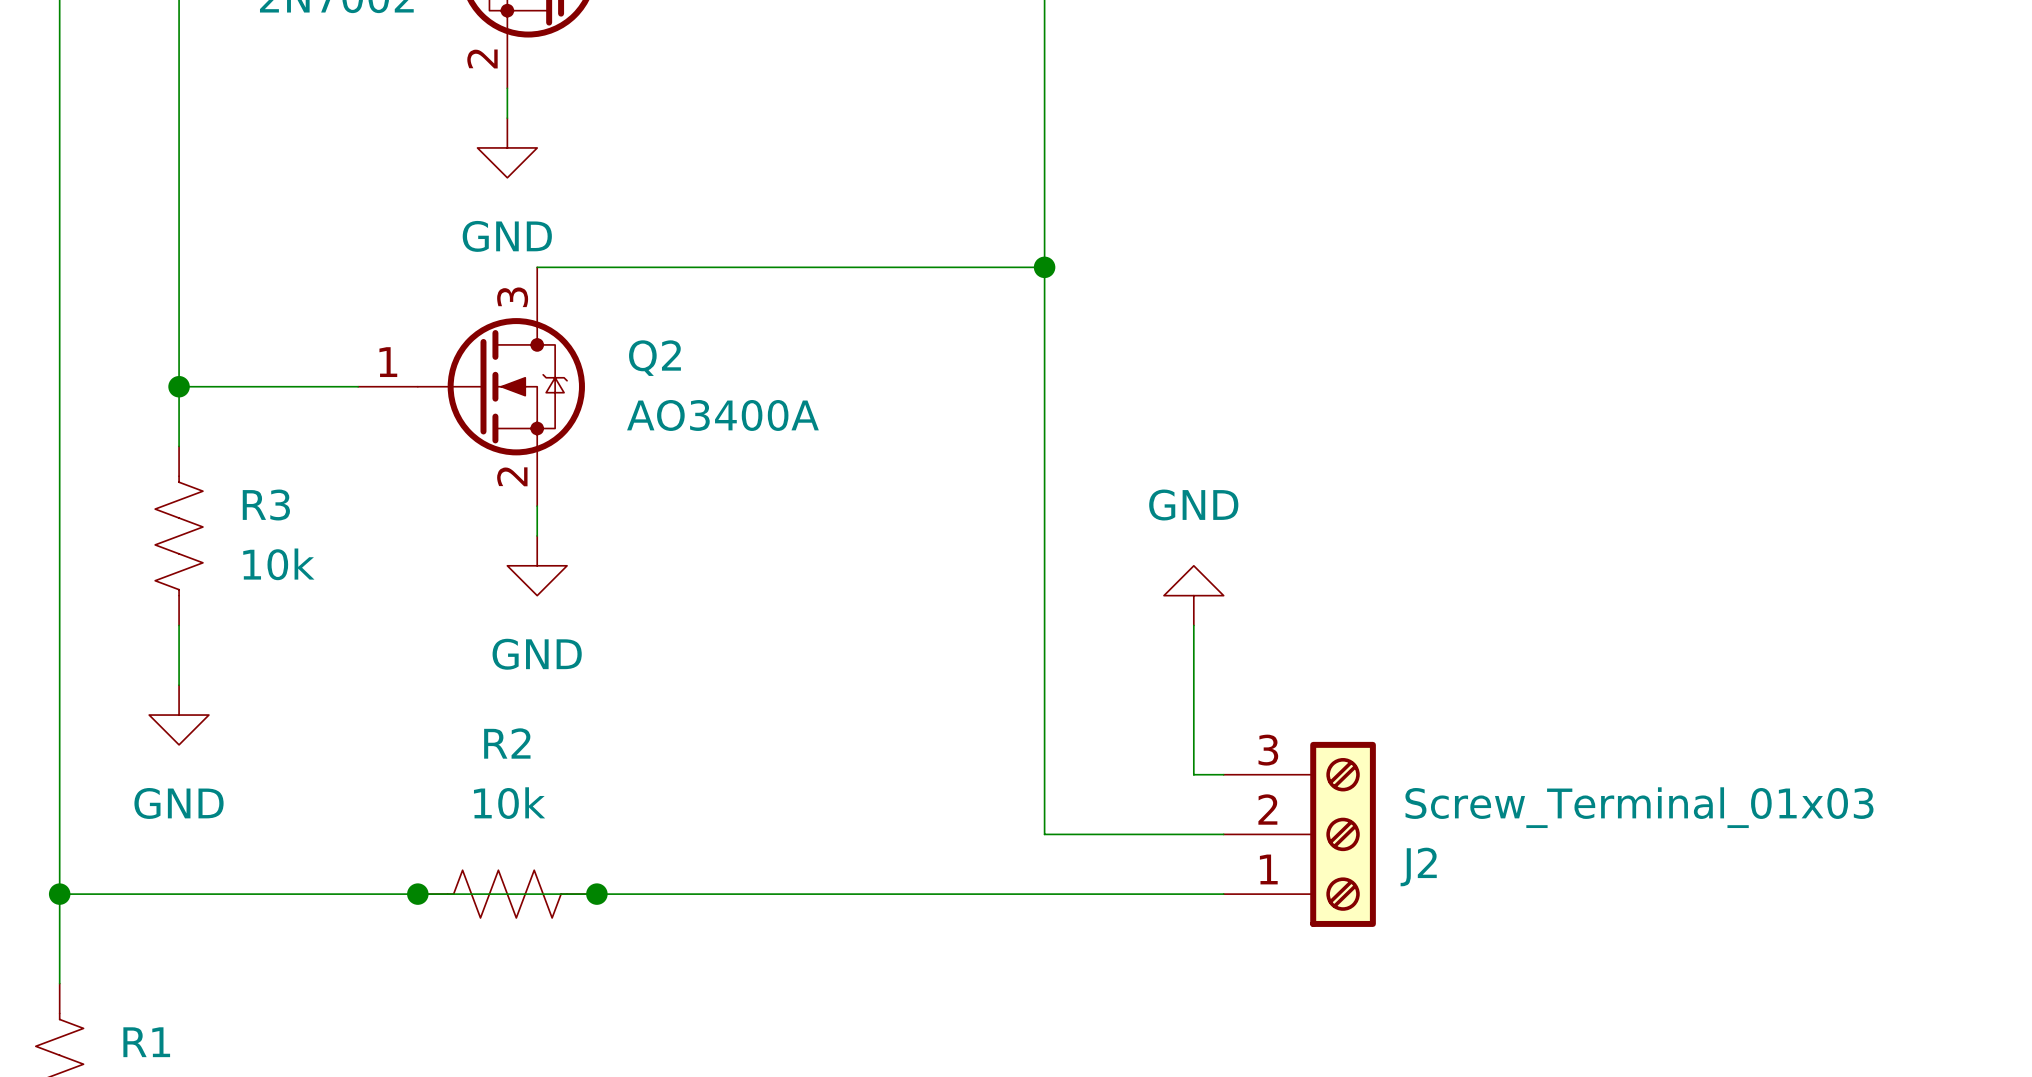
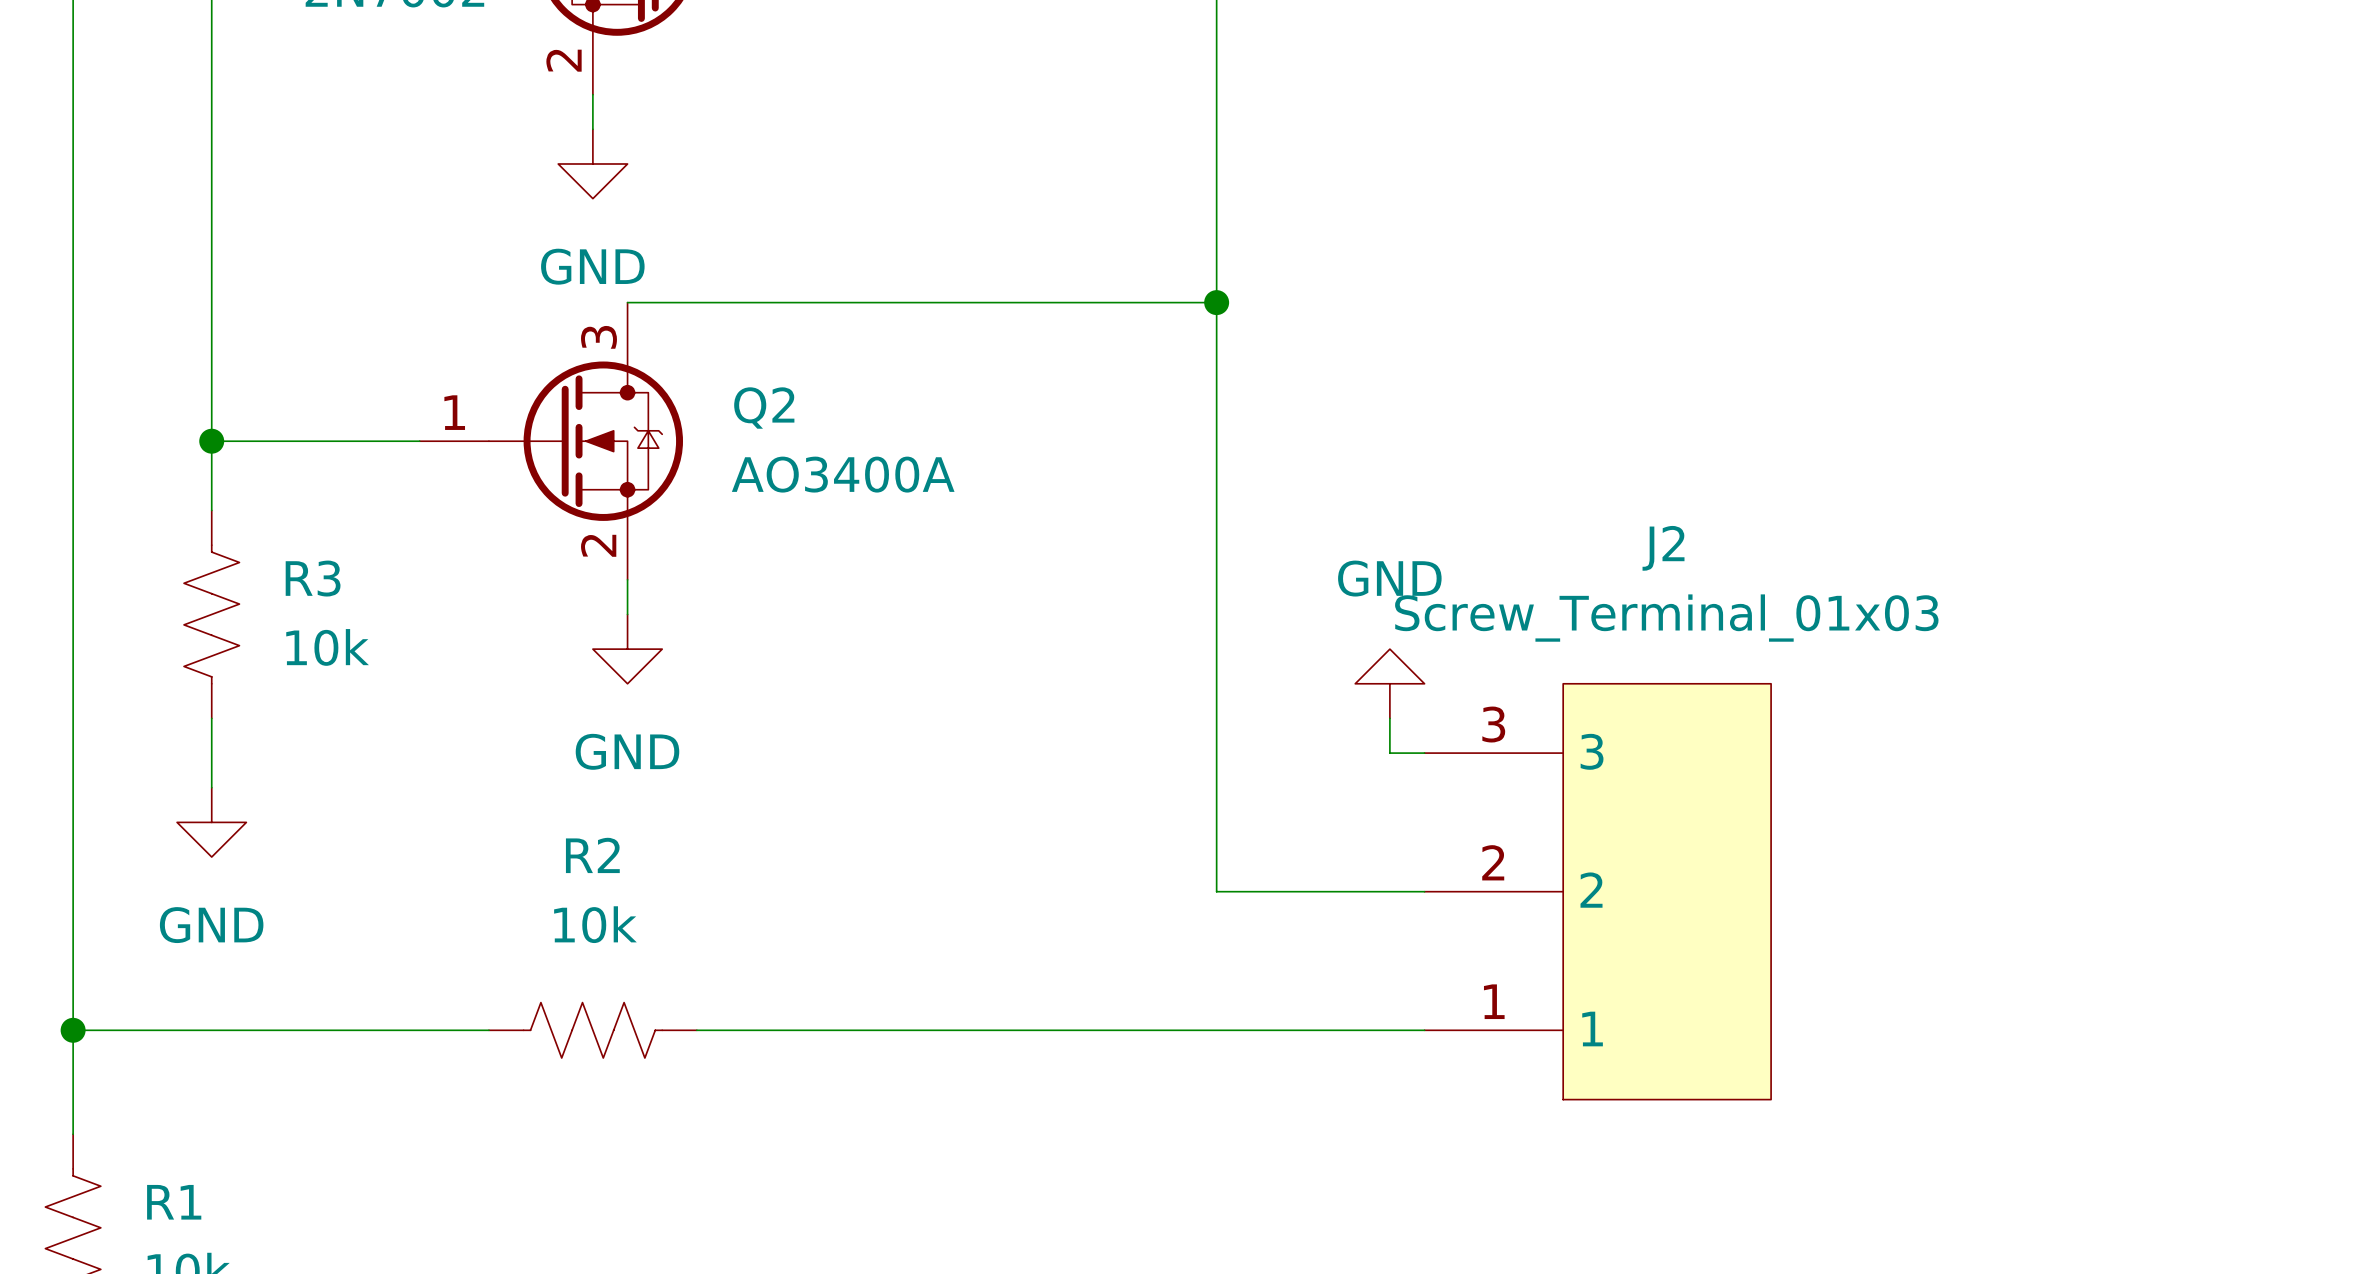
wire: (1193, 655) (1193, 774) -> (1389, 753) (1424, 753)
J2 symbol: [1223, 741, 1376, 927] -> [1424, 683, 1772, 1100]
wire: (1044, 774) (1044, 834) (1223, 834) -> (1216, 891) (1389, 891)
J2 value position: Screw_Terminal_01x03 (1639, 807) -> Screw_Terminal_01x03 (1666, 618)
J2 name position: J2 (1418, 866) -> J2 (1663, 548)
wire: (417, 894) (596, 894) -> none
junction: (417, 894) -> none
junction: (596, 894) -> none

